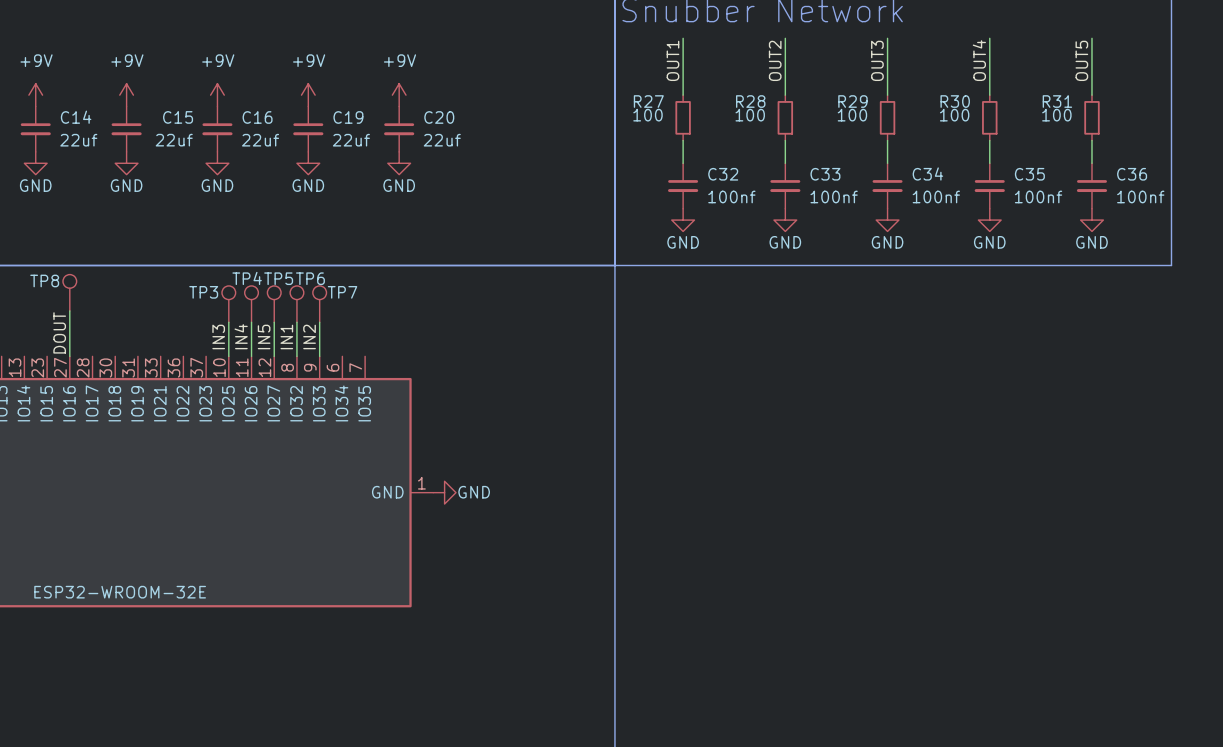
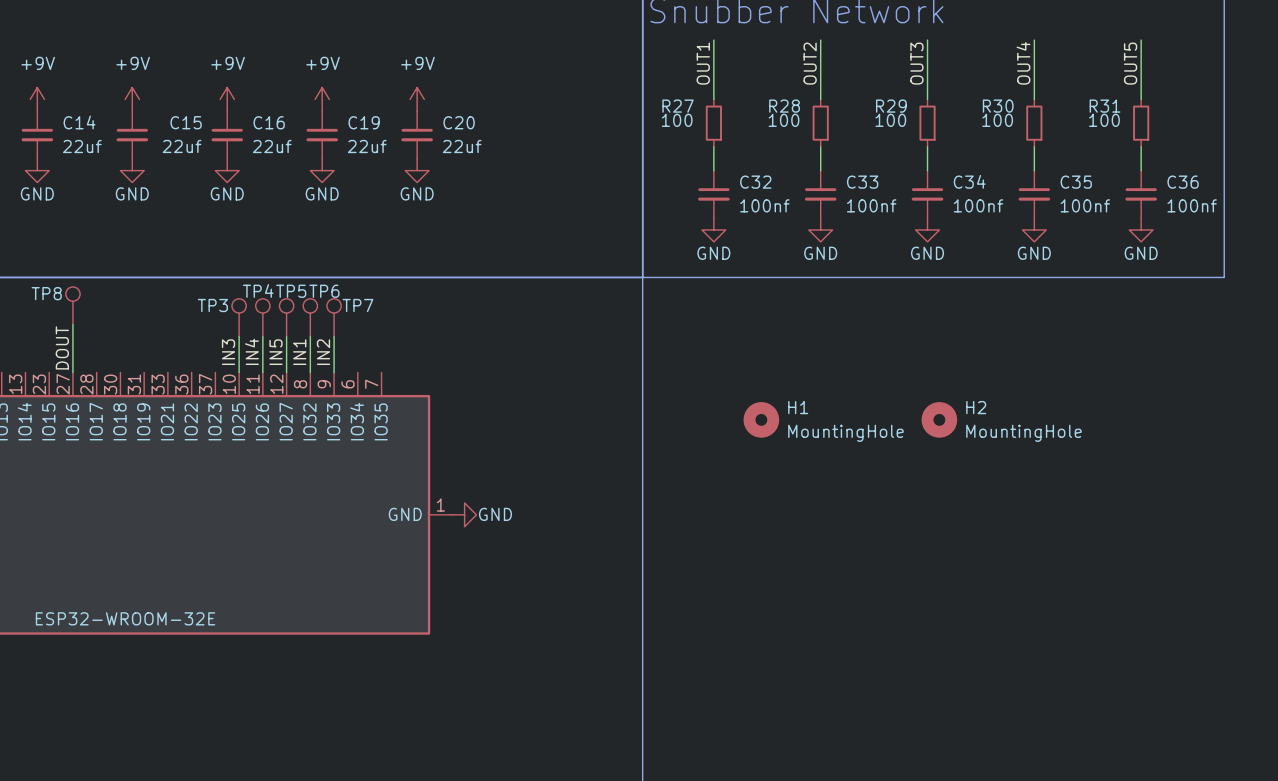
H1: none -> MountingHole (761, 419)
H2: none -> MountingHole (939, 419)

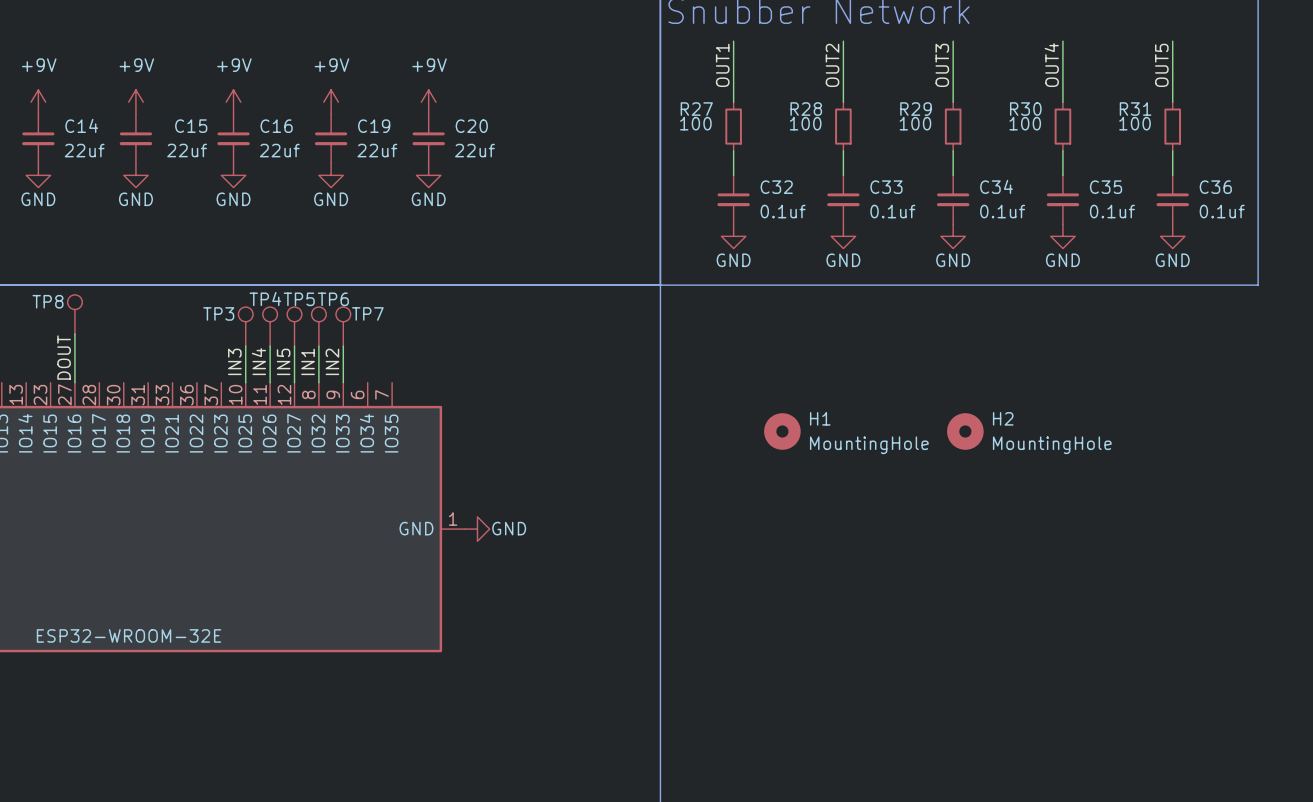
C32 value: 100nf (764, 205) -> 0.1uf (783, 211)
C33 value: 100nf (871, 205) -> 0.1uf (892, 211)
C34 value: 100nf (978, 205) -> 0.1uf (1002, 211)
C35 value: 100nf (1085, 205) -> 0.1uf (1112, 211)
C36 value: 100nf (1192, 205) -> 0.1uf (1222, 211)

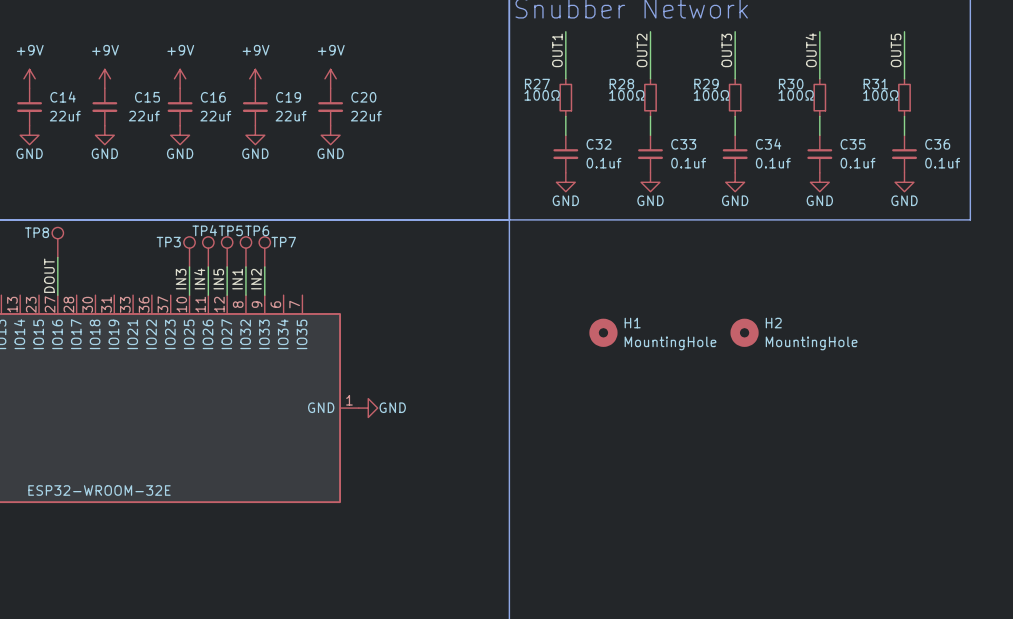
R27 value: 100 (695, 123) -> 100Ω (542, 95)
R28 value: 100 (805, 123) -> 100Ω (626, 95)
R29 value: 100 (915, 123) -> 100Ω (711, 95)
R30 value: 100 (1025, 123) -> 100Ω (796, 95)
R31 value: 100 (1134, 123) -> 100Ω (880, 95)

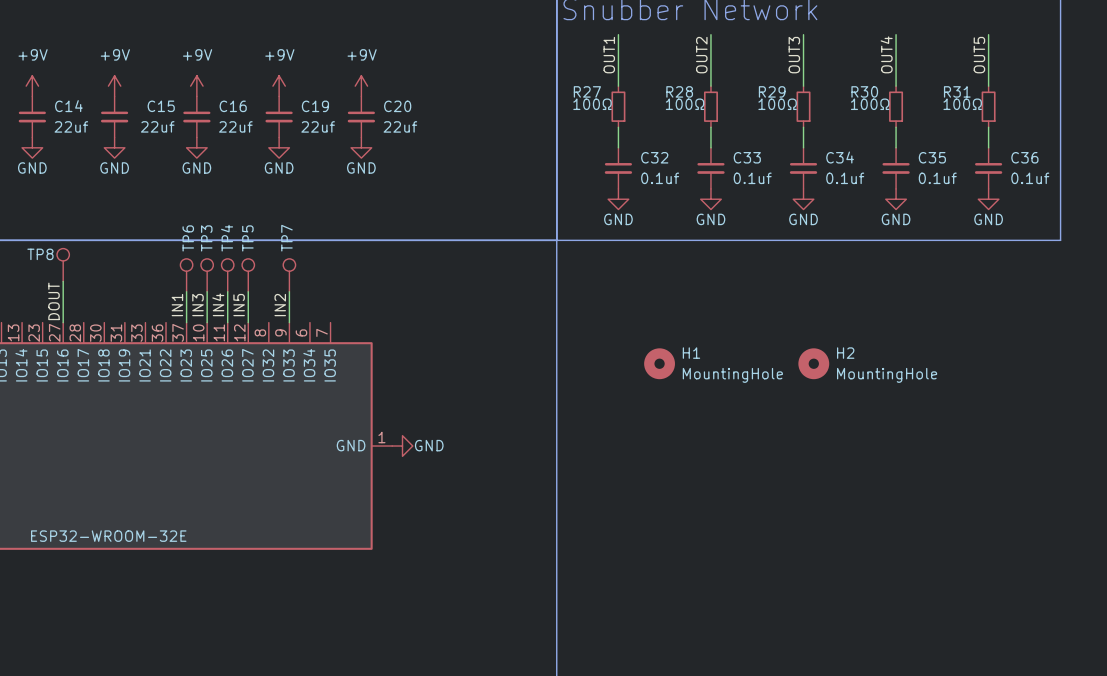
TP4 name rotation: 0° (204, 230) -> 90° counterclockwise (227, 238)
TP5 name rotation: 0° (230, 230) -> 90° counterclockwise (247, 238)
TP6 name rotation: 0° (257, 230) -> 90° counterclockwise (188, 238)
TP3 name rotation: 0° (168, 242) -> 90° counterclockwise (206, 238)
TP3 name position: TP3 (168, 242) -> TP3 (206, 238)
TP7 name rotation: 0° (283, 242) -> 90° counterclockwise (286, 238)
TP7 name position: TP7 (283, 242) -> TP7 (286, 238)
TP6 position: (245, 251) -> (186, 275)
wire: (245, 266) (245, 295) -> (186, 291) (186, 322)
label position: IN1 (237, 279) -> IN1 (177, 305)

